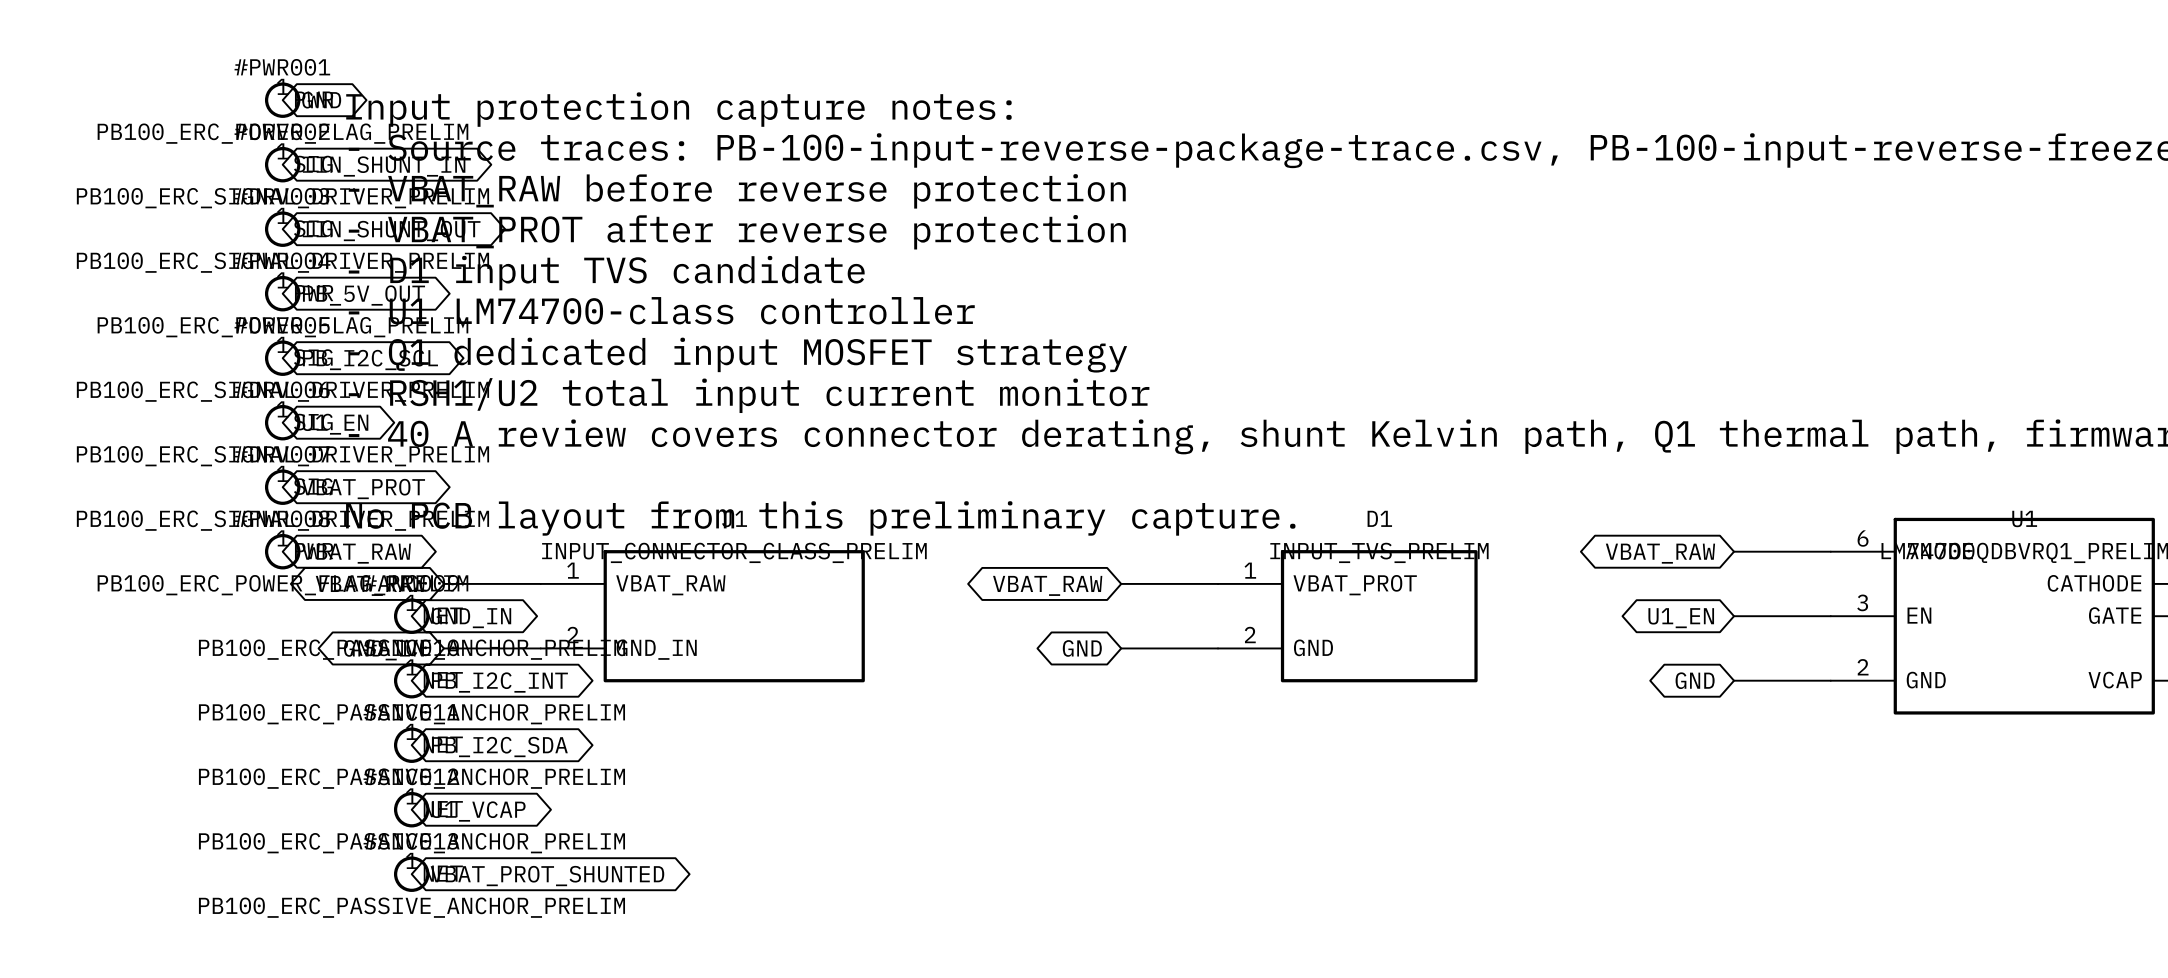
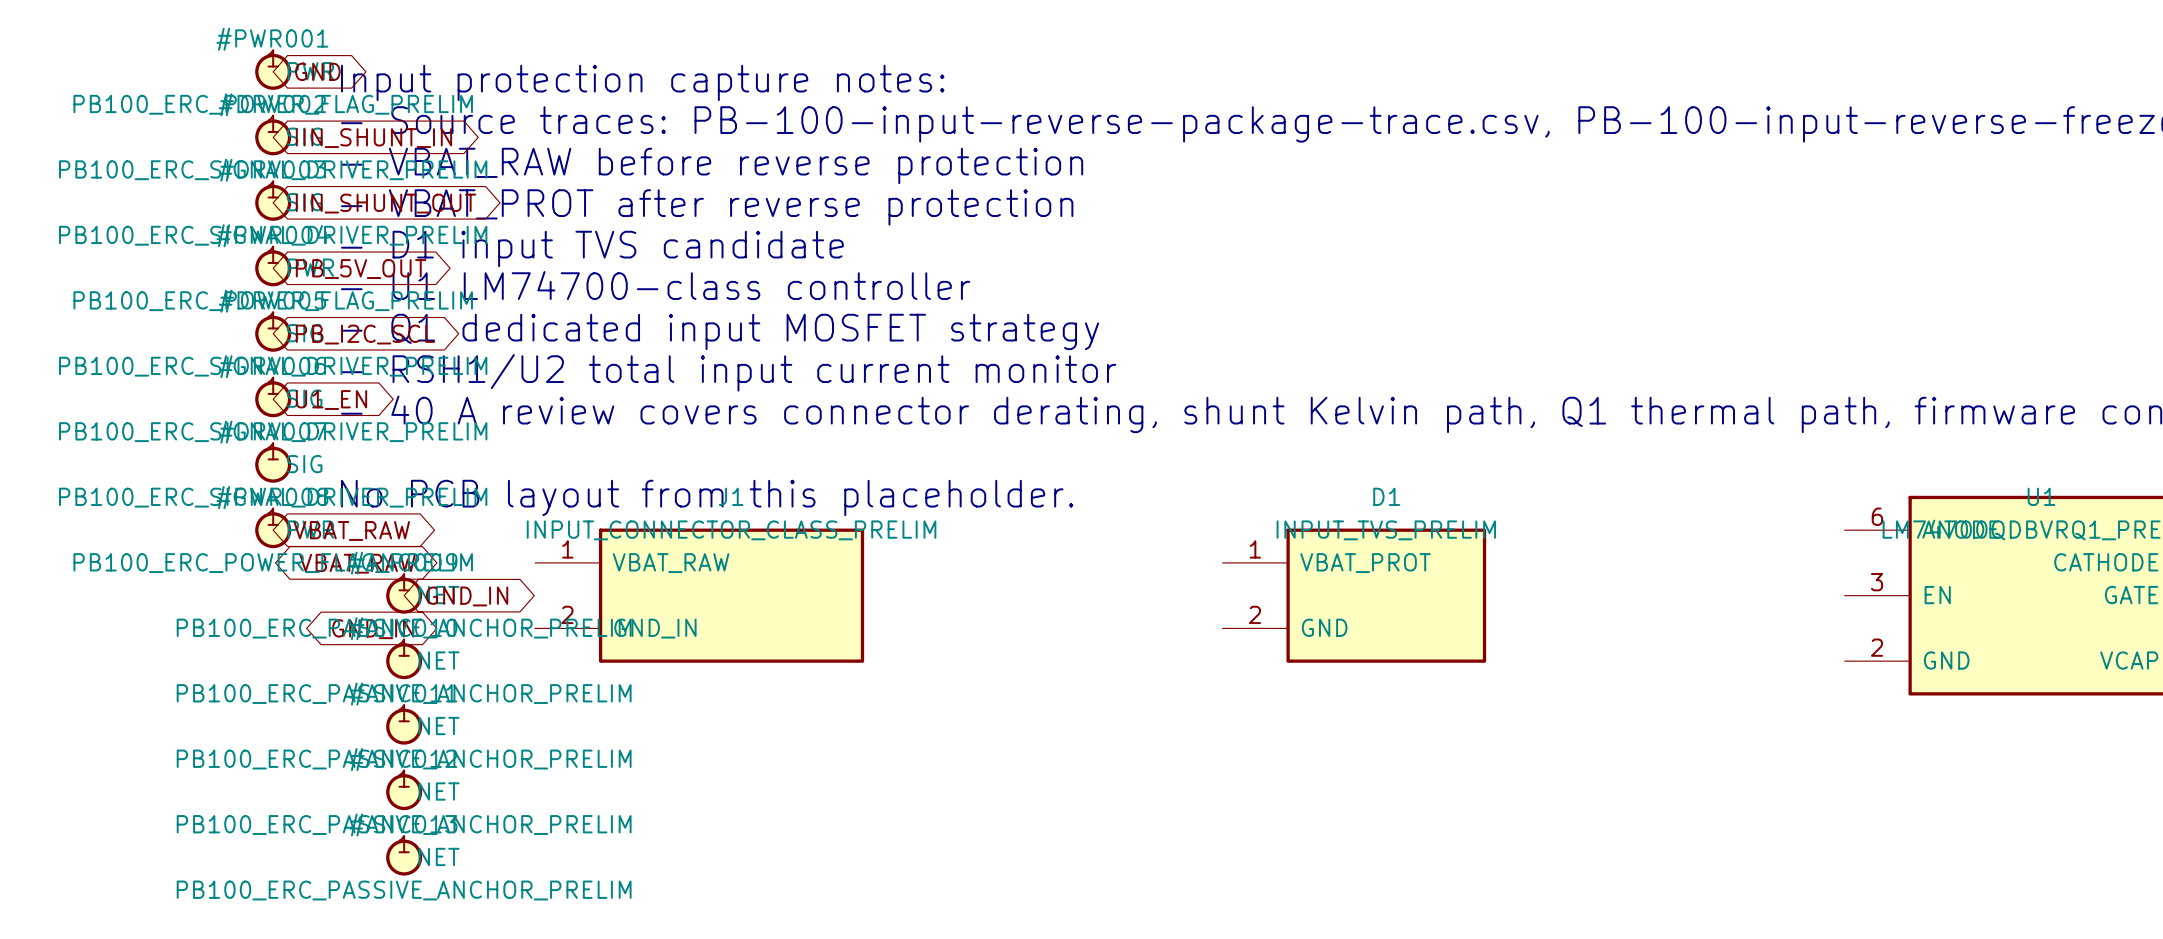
global label: VBAT_PROT (363, 489) -> none
text: No PCB layout from this preliminary capture. (820, 518) -> No PCB layout from this placeholder. (707, 497)
wire: (1734, 551) (1830, 551) -> none
global label: VBAT_RAW (1660, 553) -> none
wire: (443, 583) (540, 583) -> none
wire: (1121, 583) (1218, 583) -> none
global label: VBAT_RAW (1047, 585) -> none
wire: (1734, 616) (1830, 616) -> none
global label: U1_EN (1681, 618) -> none
wire: (443, 648) (540, 648) -> none
global label: GND (1082, 648) -> none
wire: (1121, 648) (1218, 648) -> none
global label: GND (1695, 680) -> none
wire: (1734, 680) (1830, 680) -> none
global label: PB_I2C_INT (499, 682) -> none
global label: PB_I2C_SDA (499, 747) -> none
global label: U1_VCAP (478, 811) -> none
global label: VBAT_PROT_SHUNTED (547, 876) -> none

